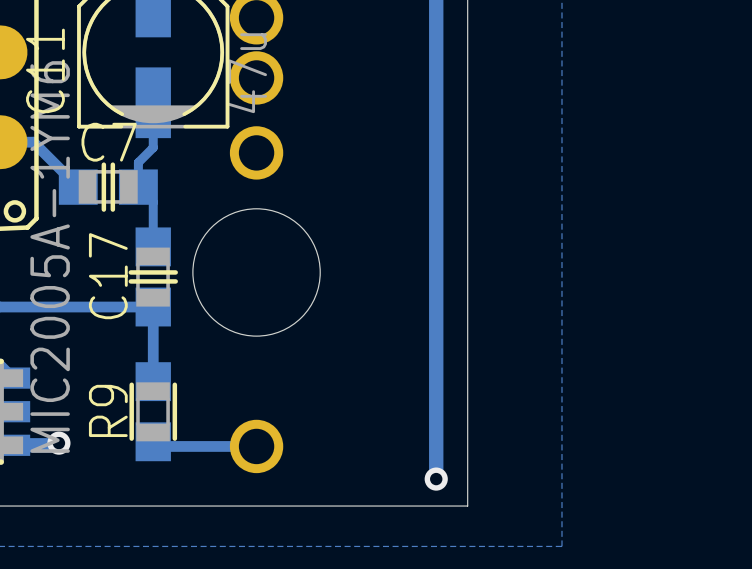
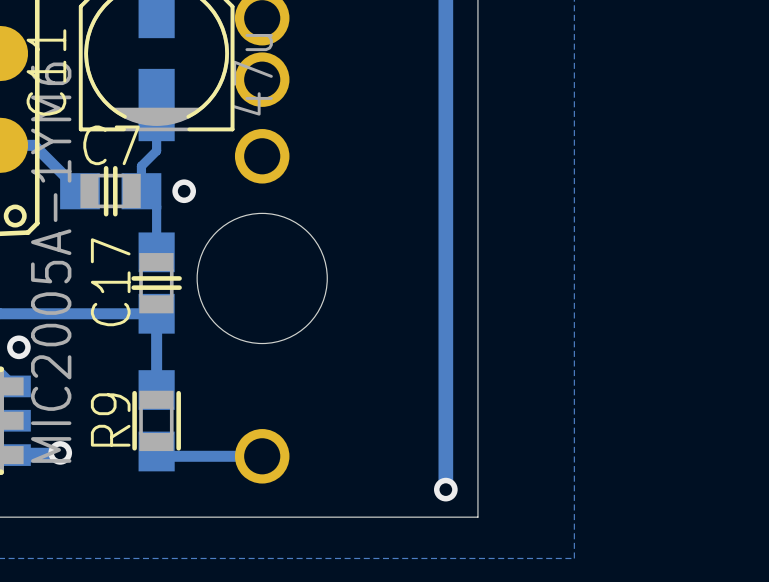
via: none -> (184, 191)
via: none -> (18, 347)

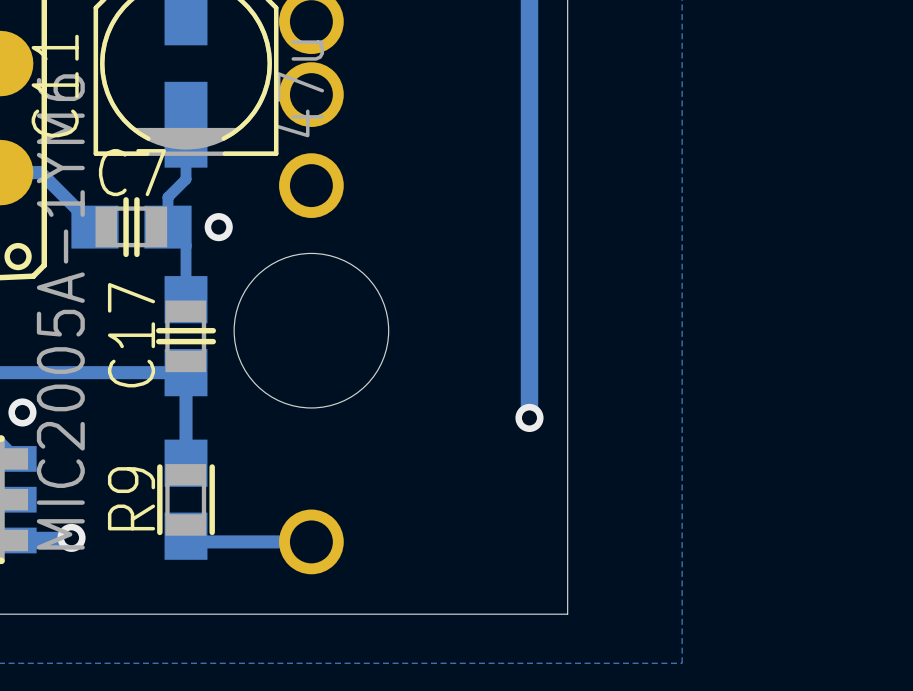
track: (445, 351) (445, 489) -> none
via position: (445, 489) -> (529, 417)

